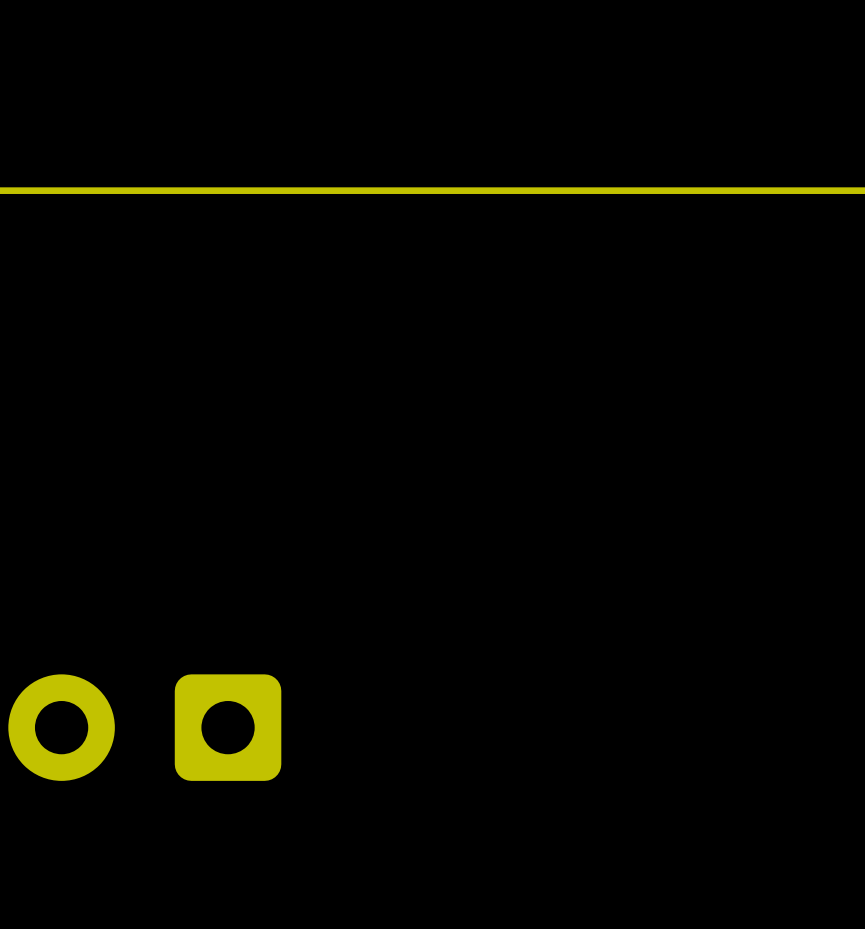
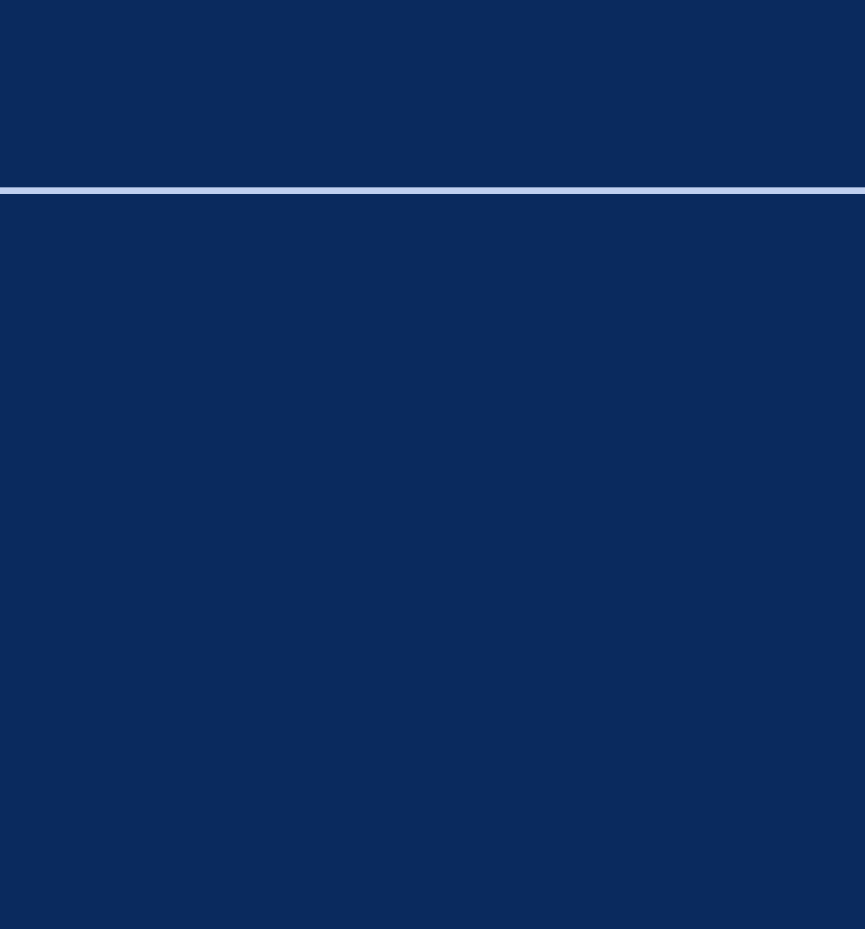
part: (144, 727) -> none

